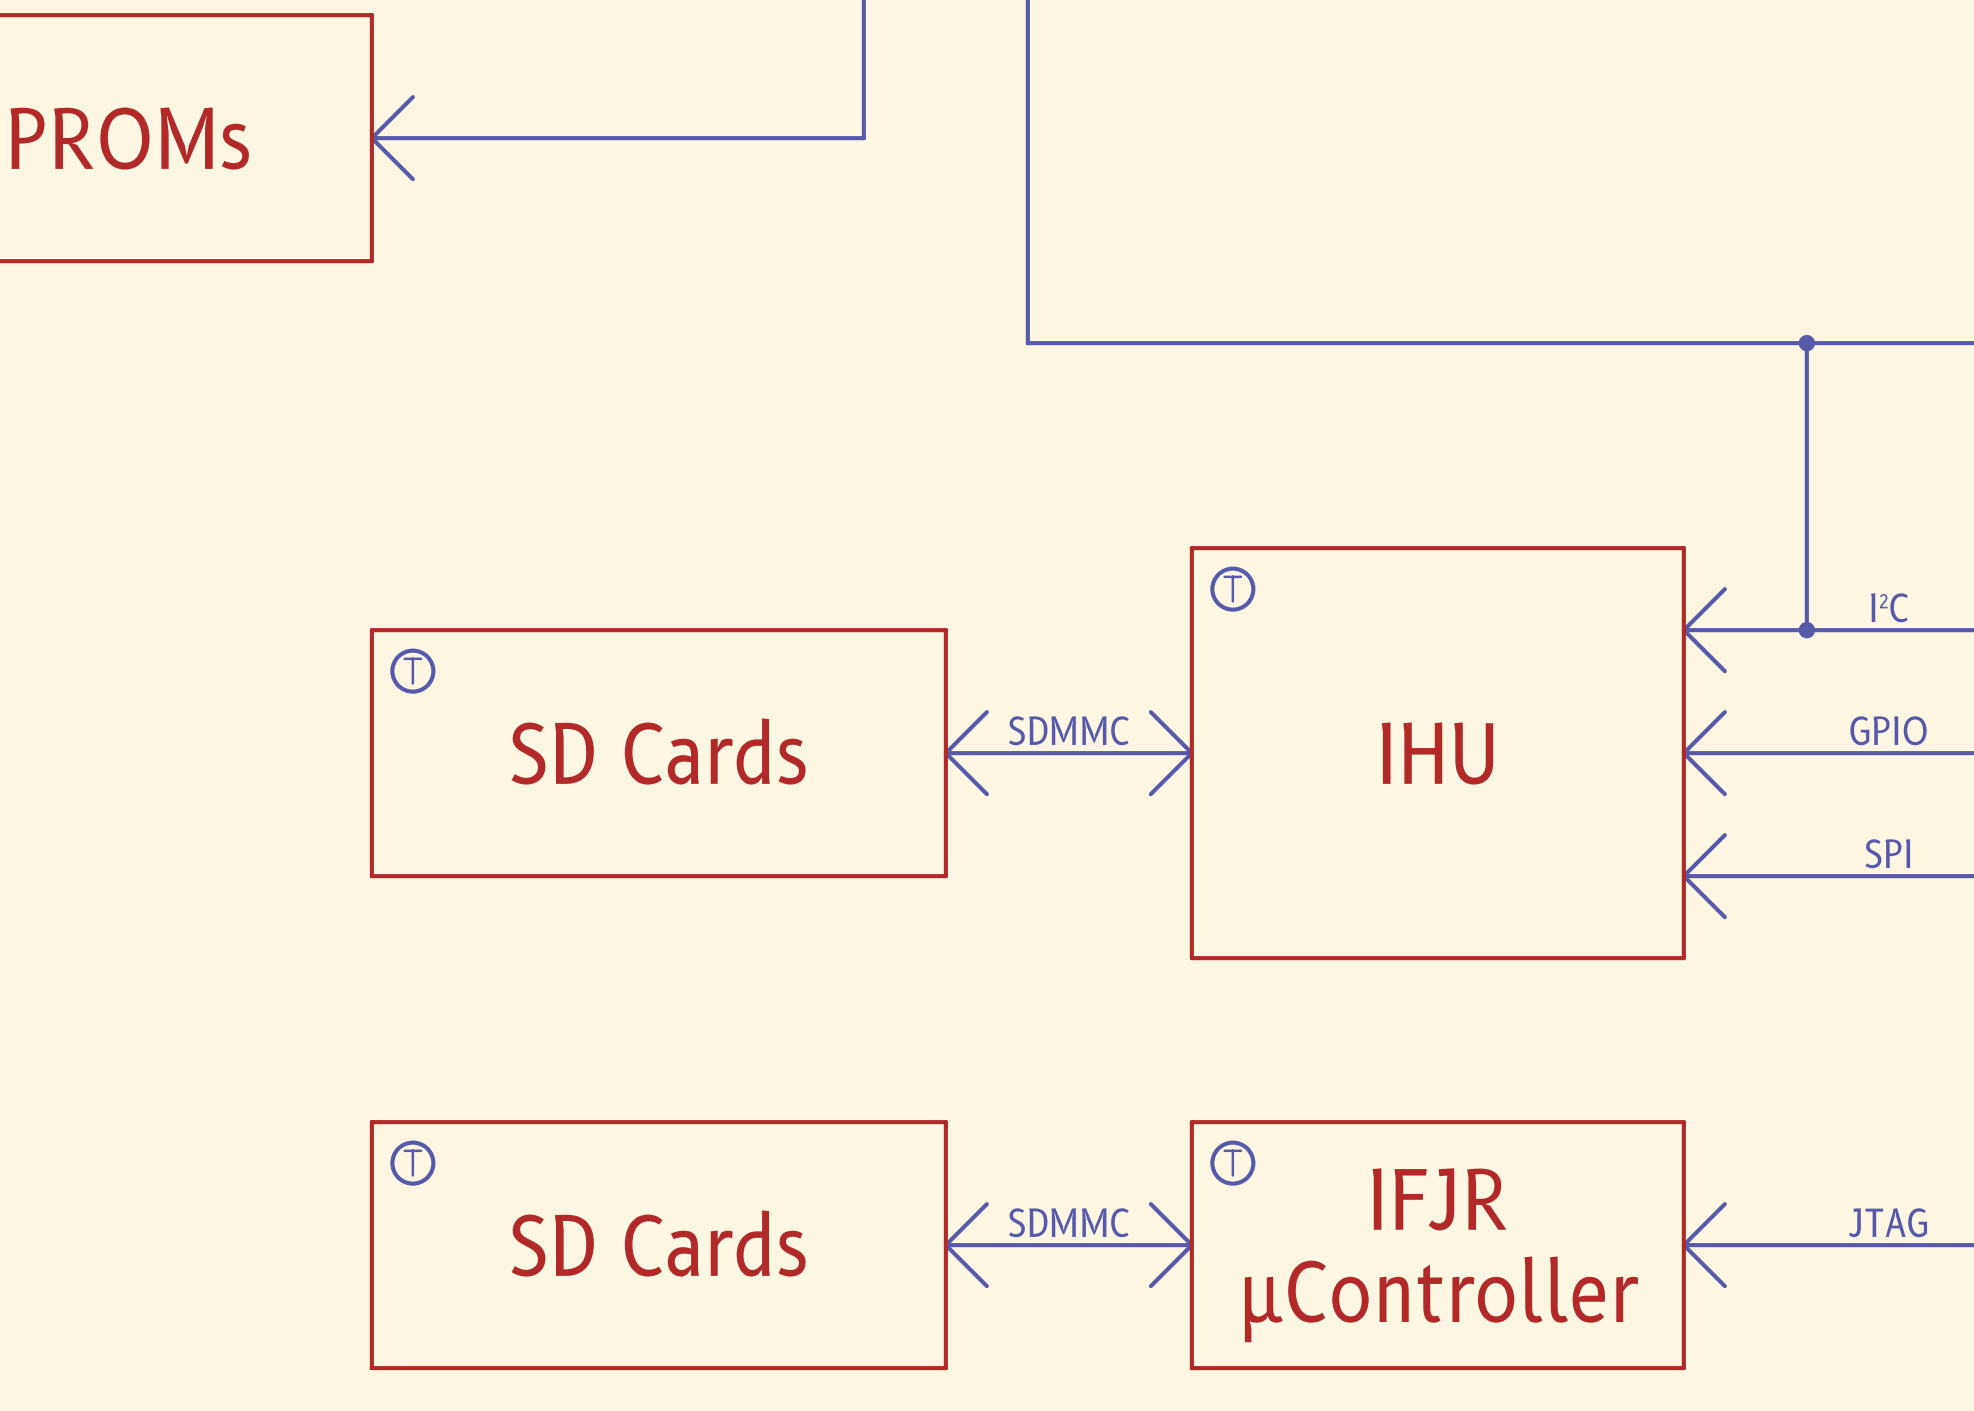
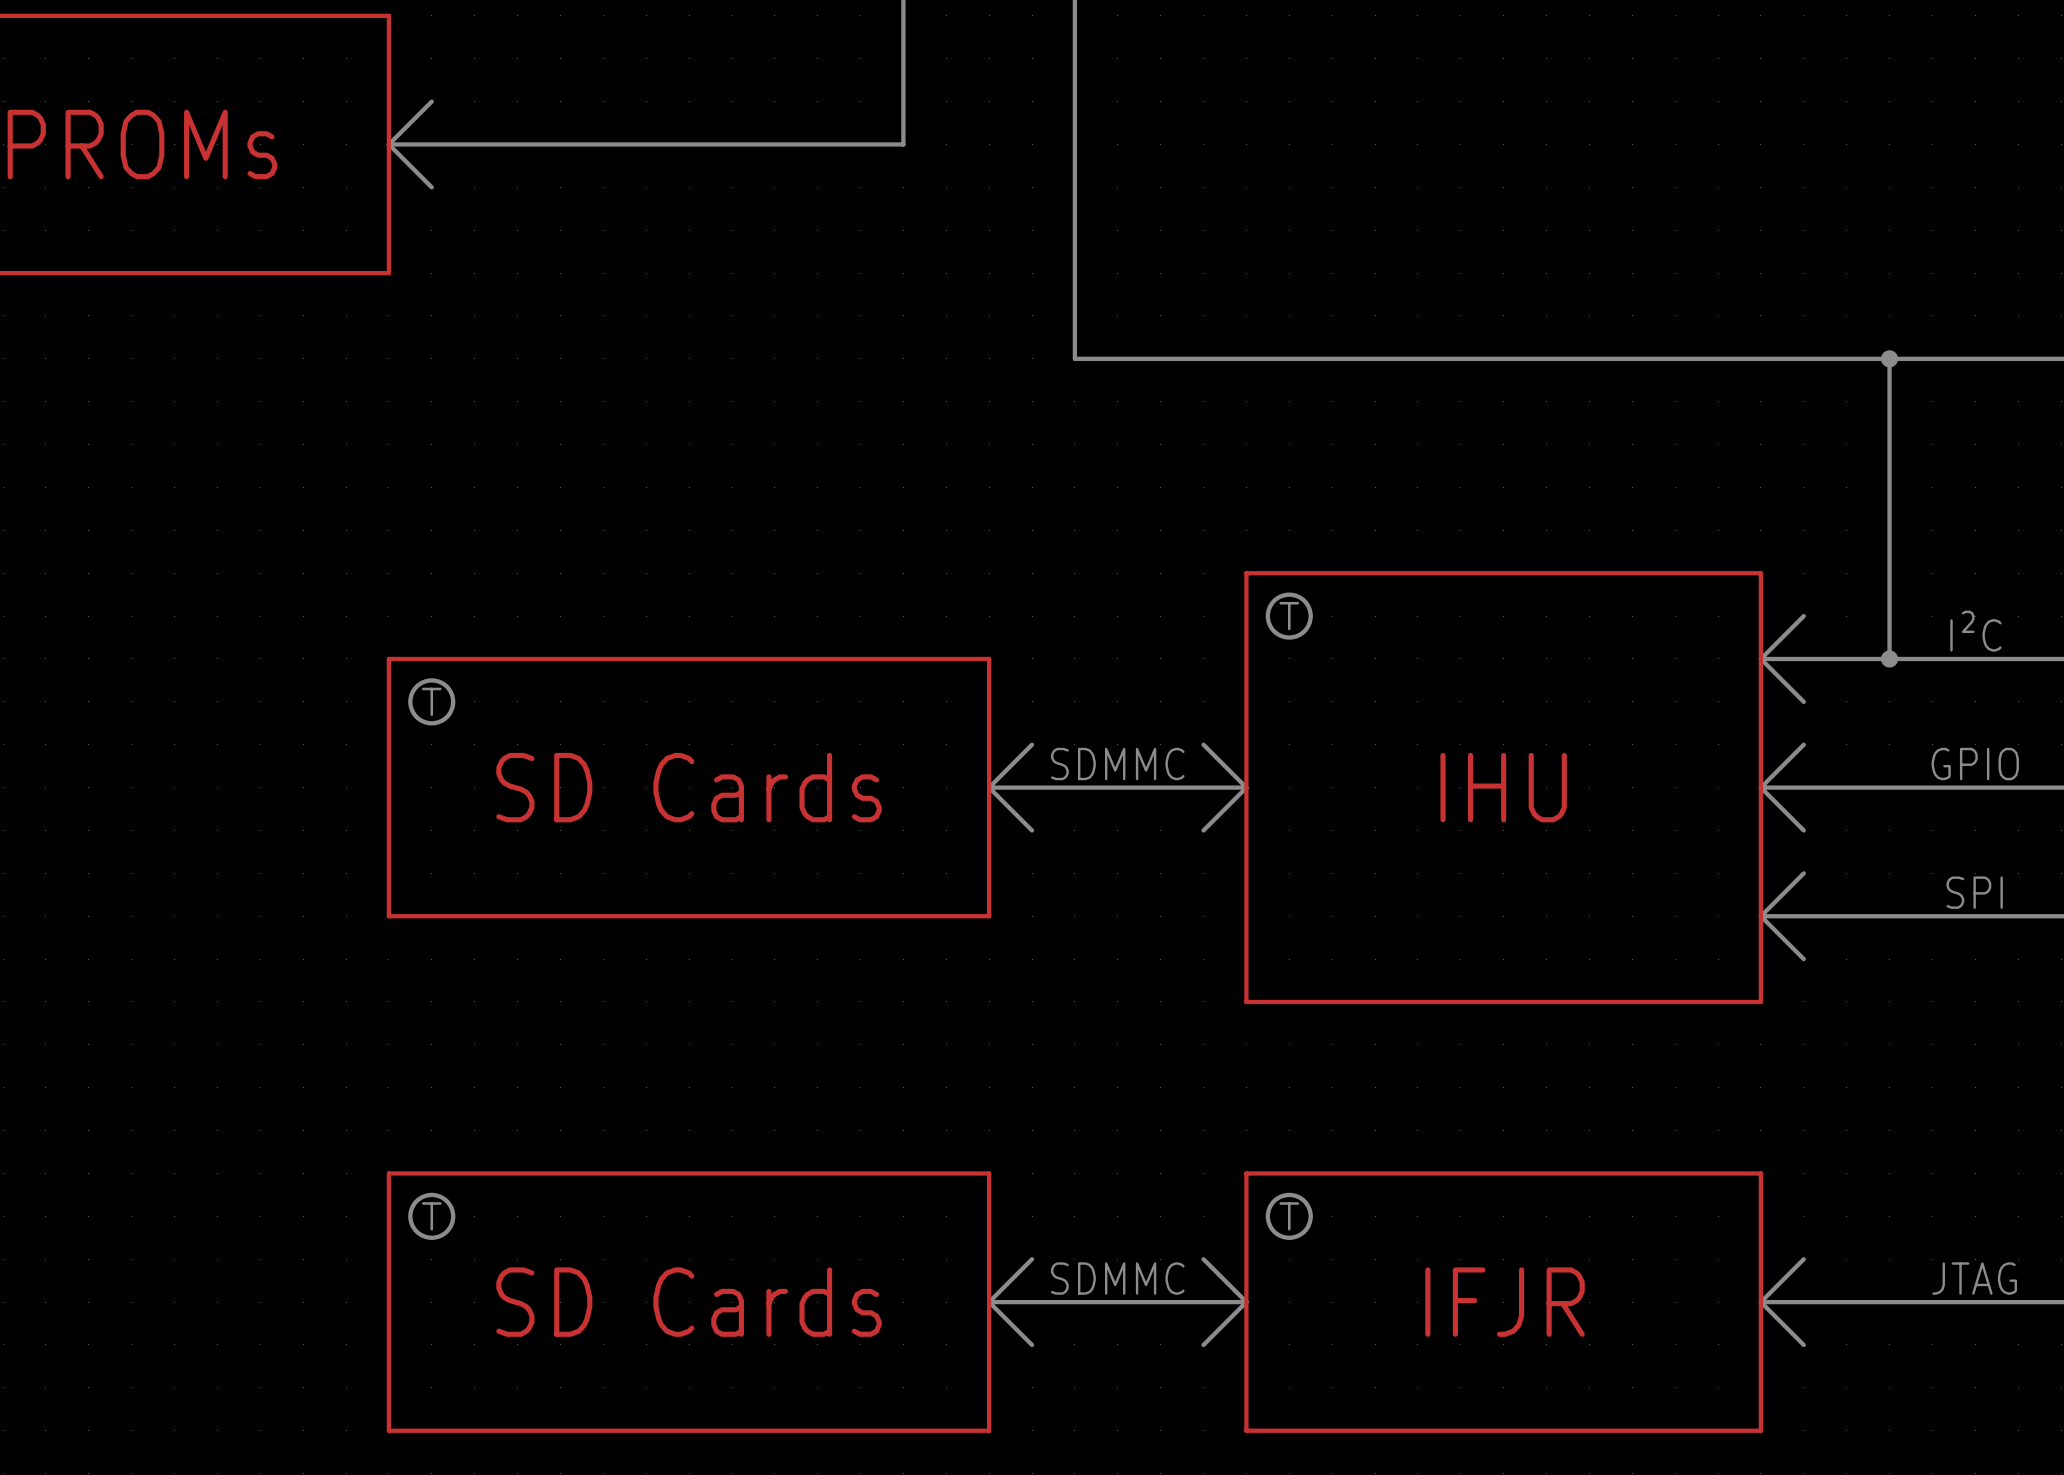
text position: IFJR (1439, 1199) -> IFJR (1505, 1302)
text: µController (1441, 1299) -> none

